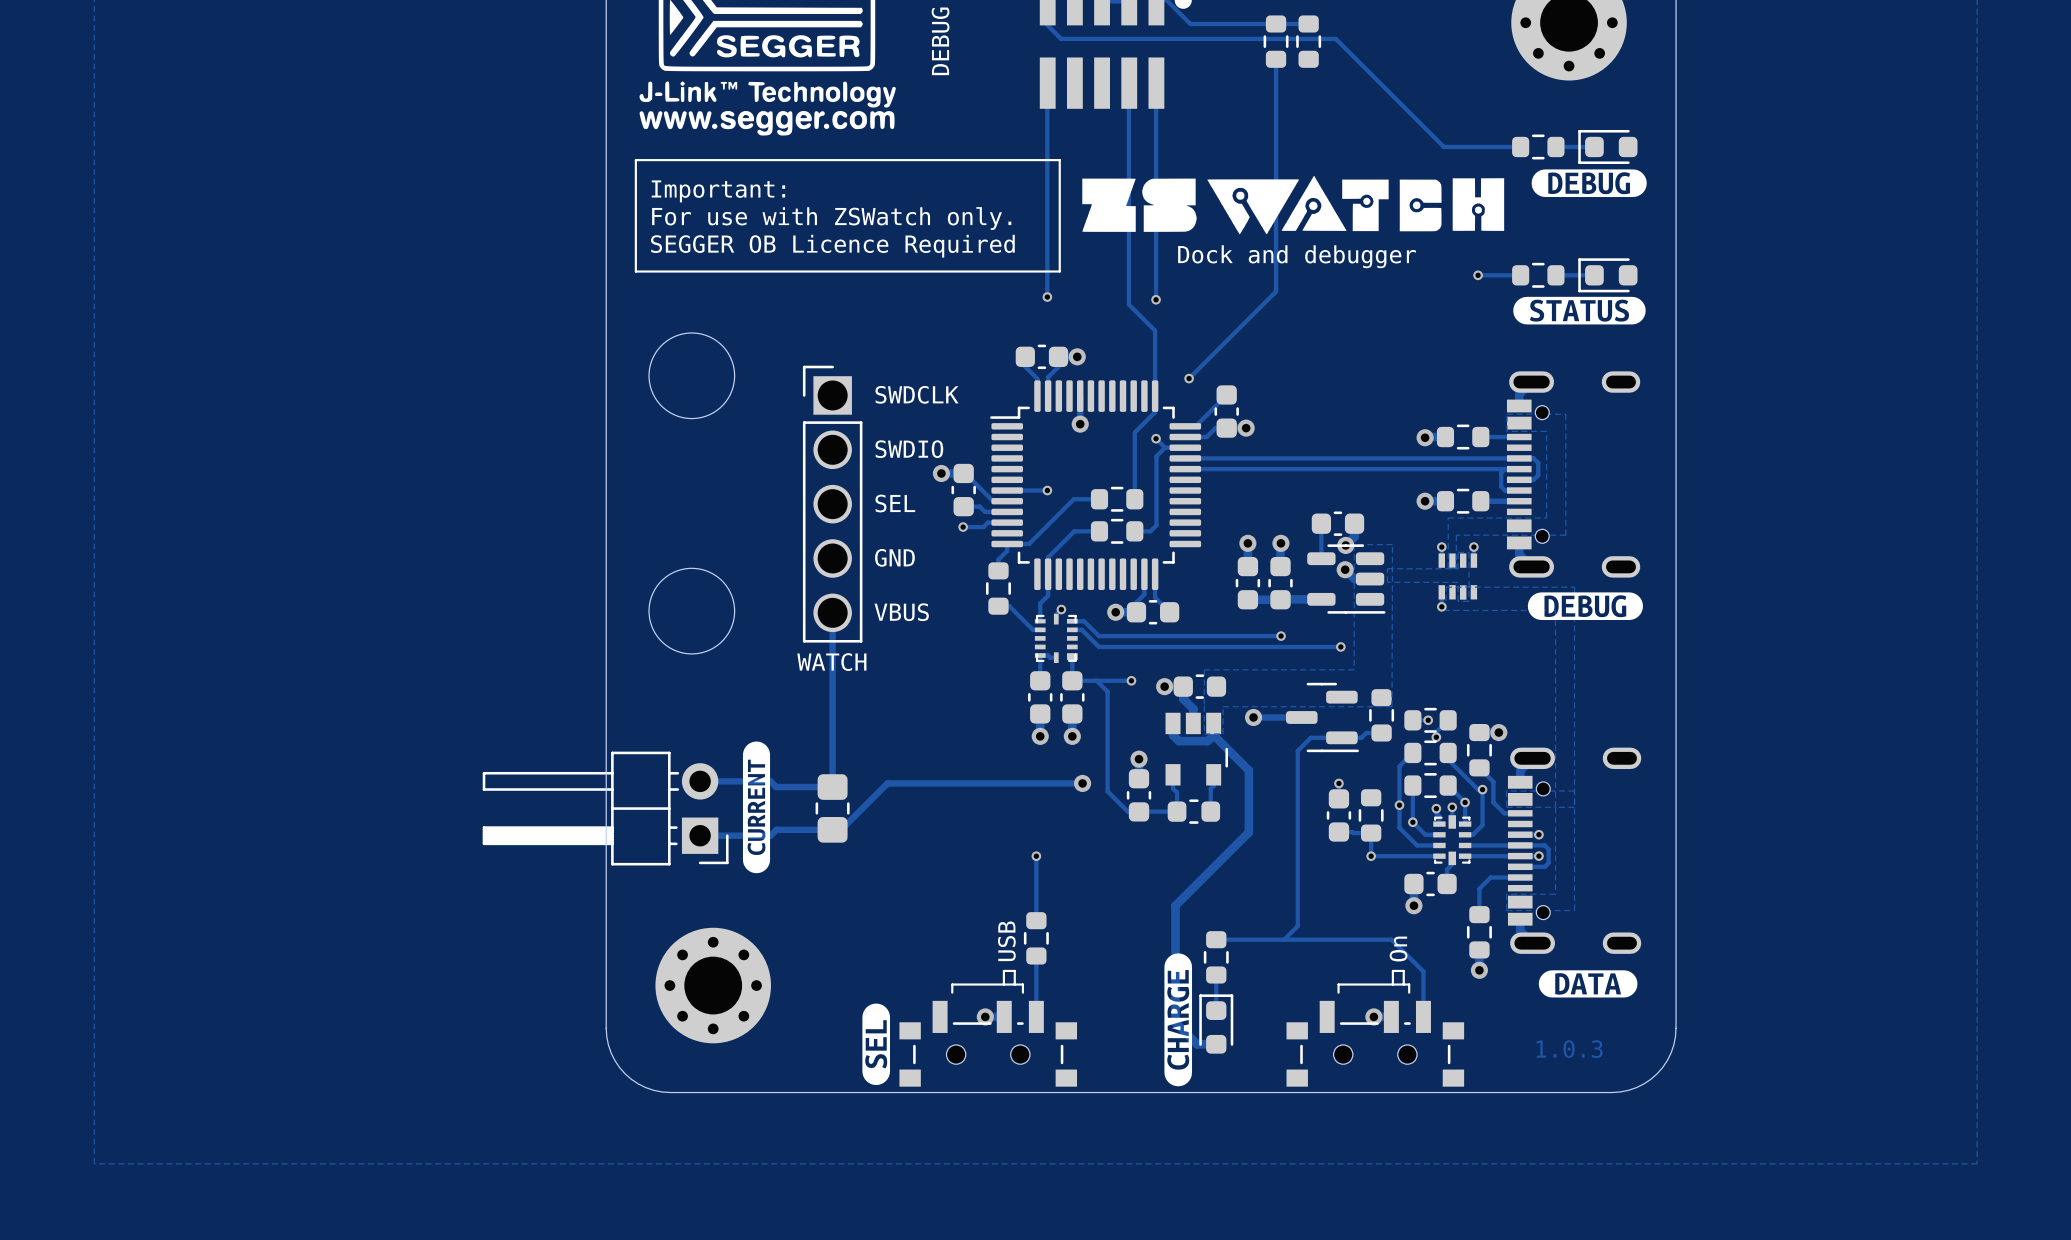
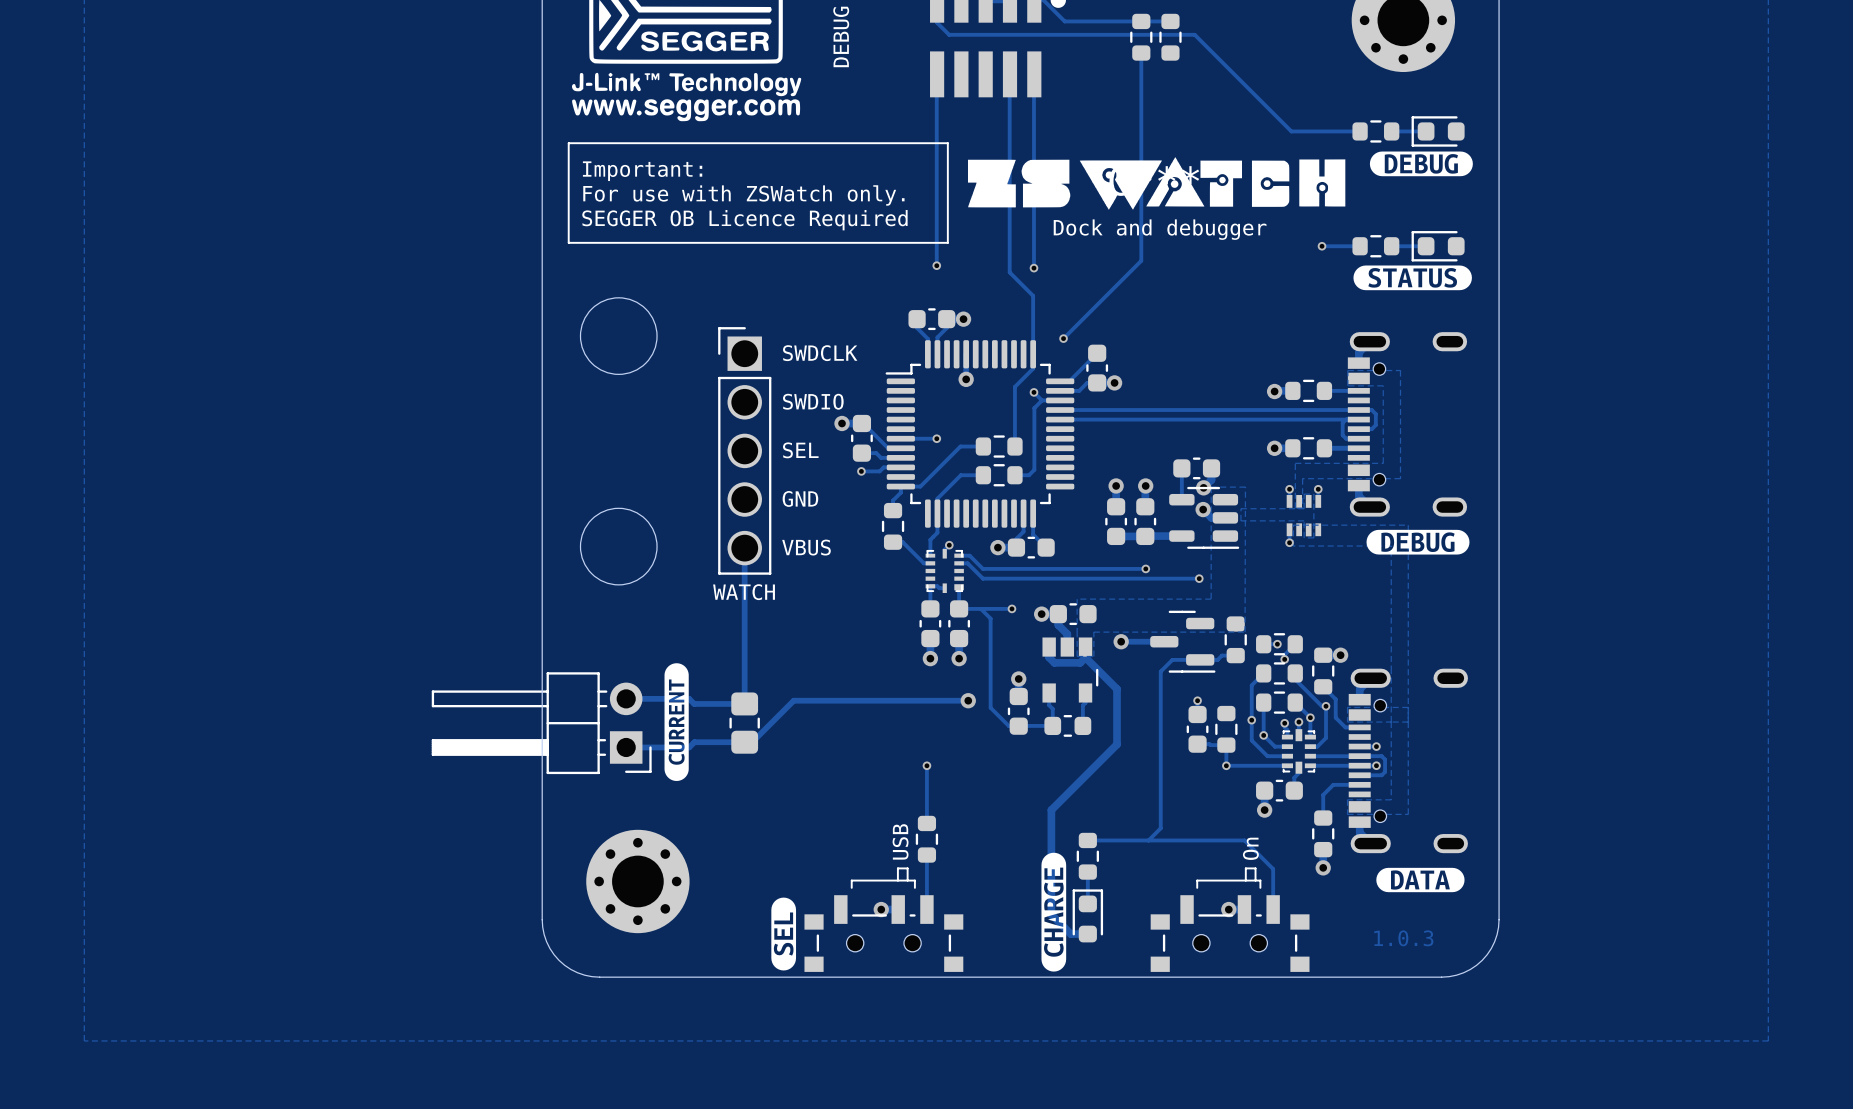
drawing: [1082, 175, 1505, 235] -> none
part: none -> (1156, 183)

